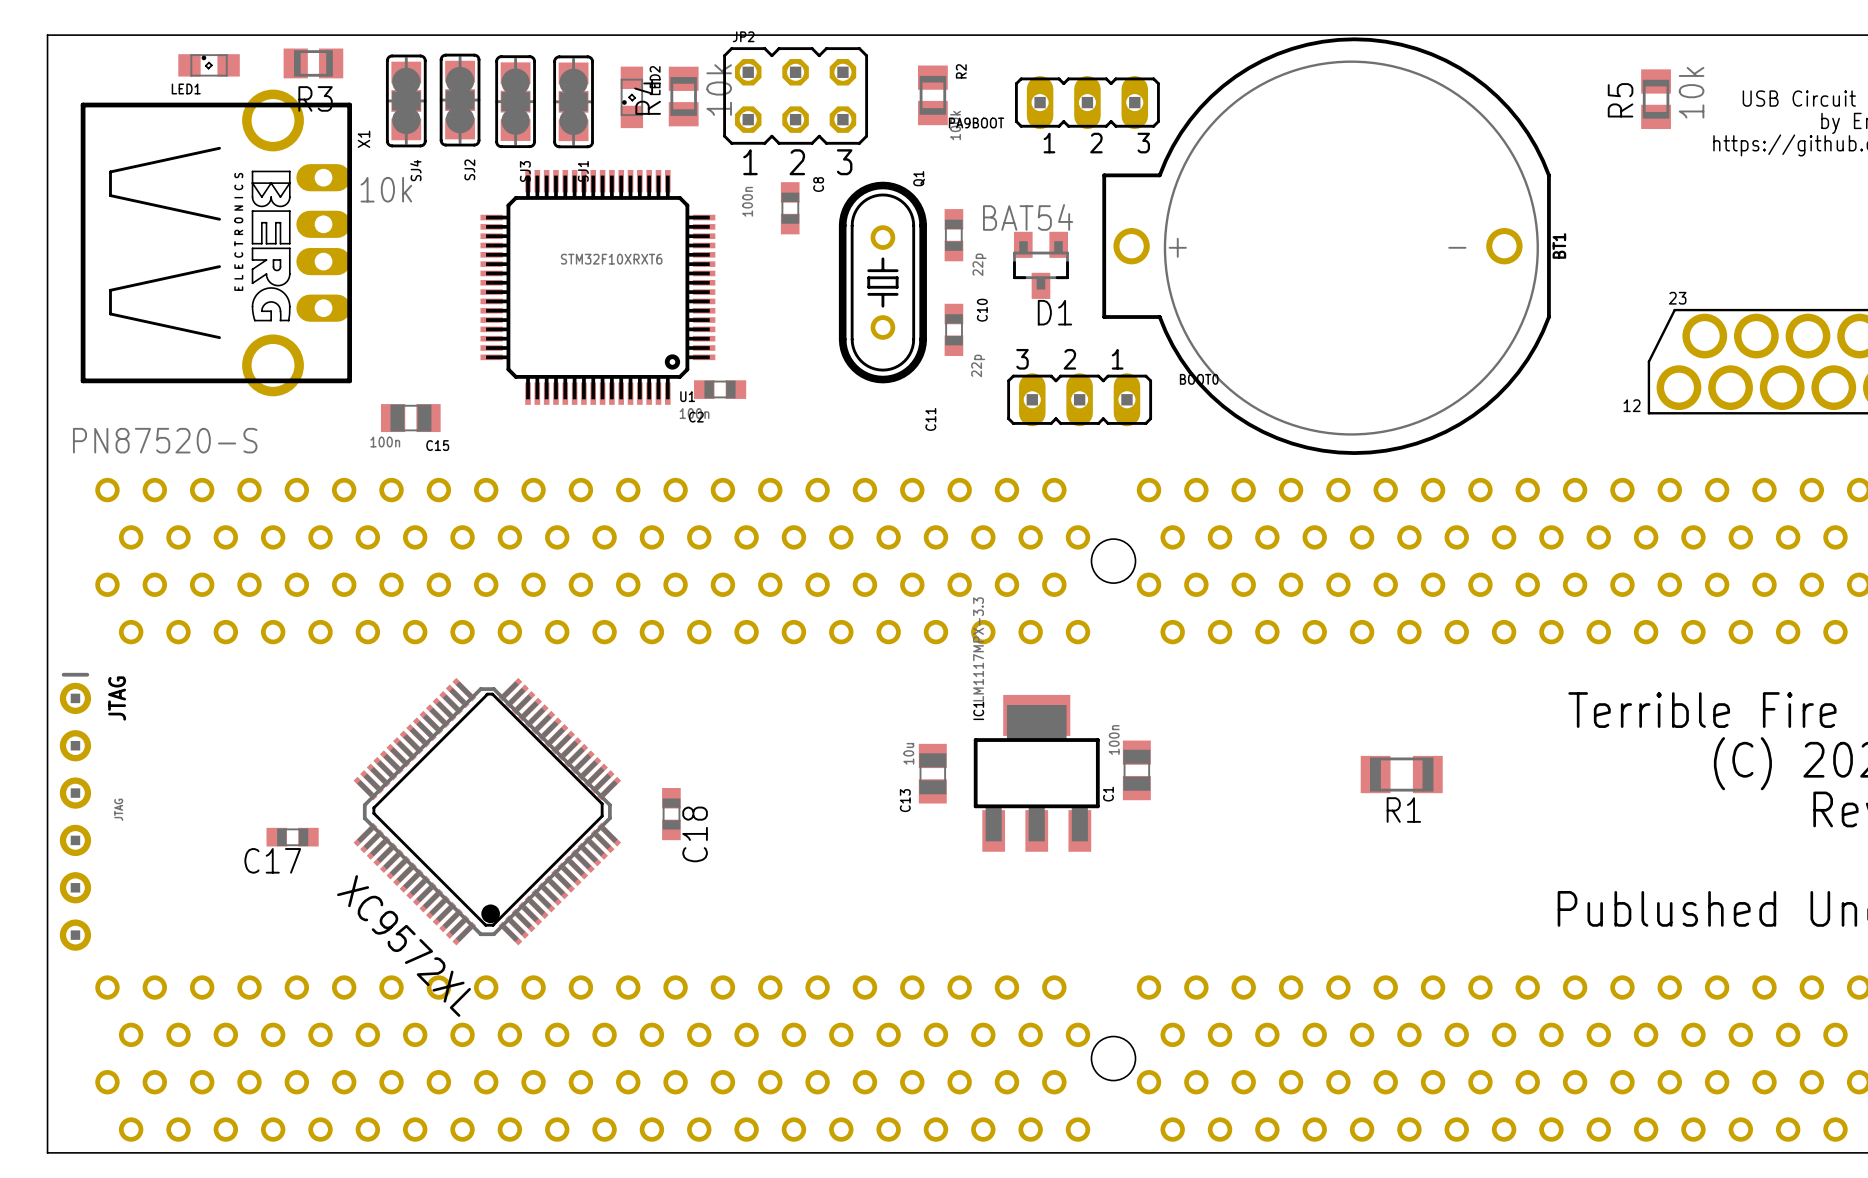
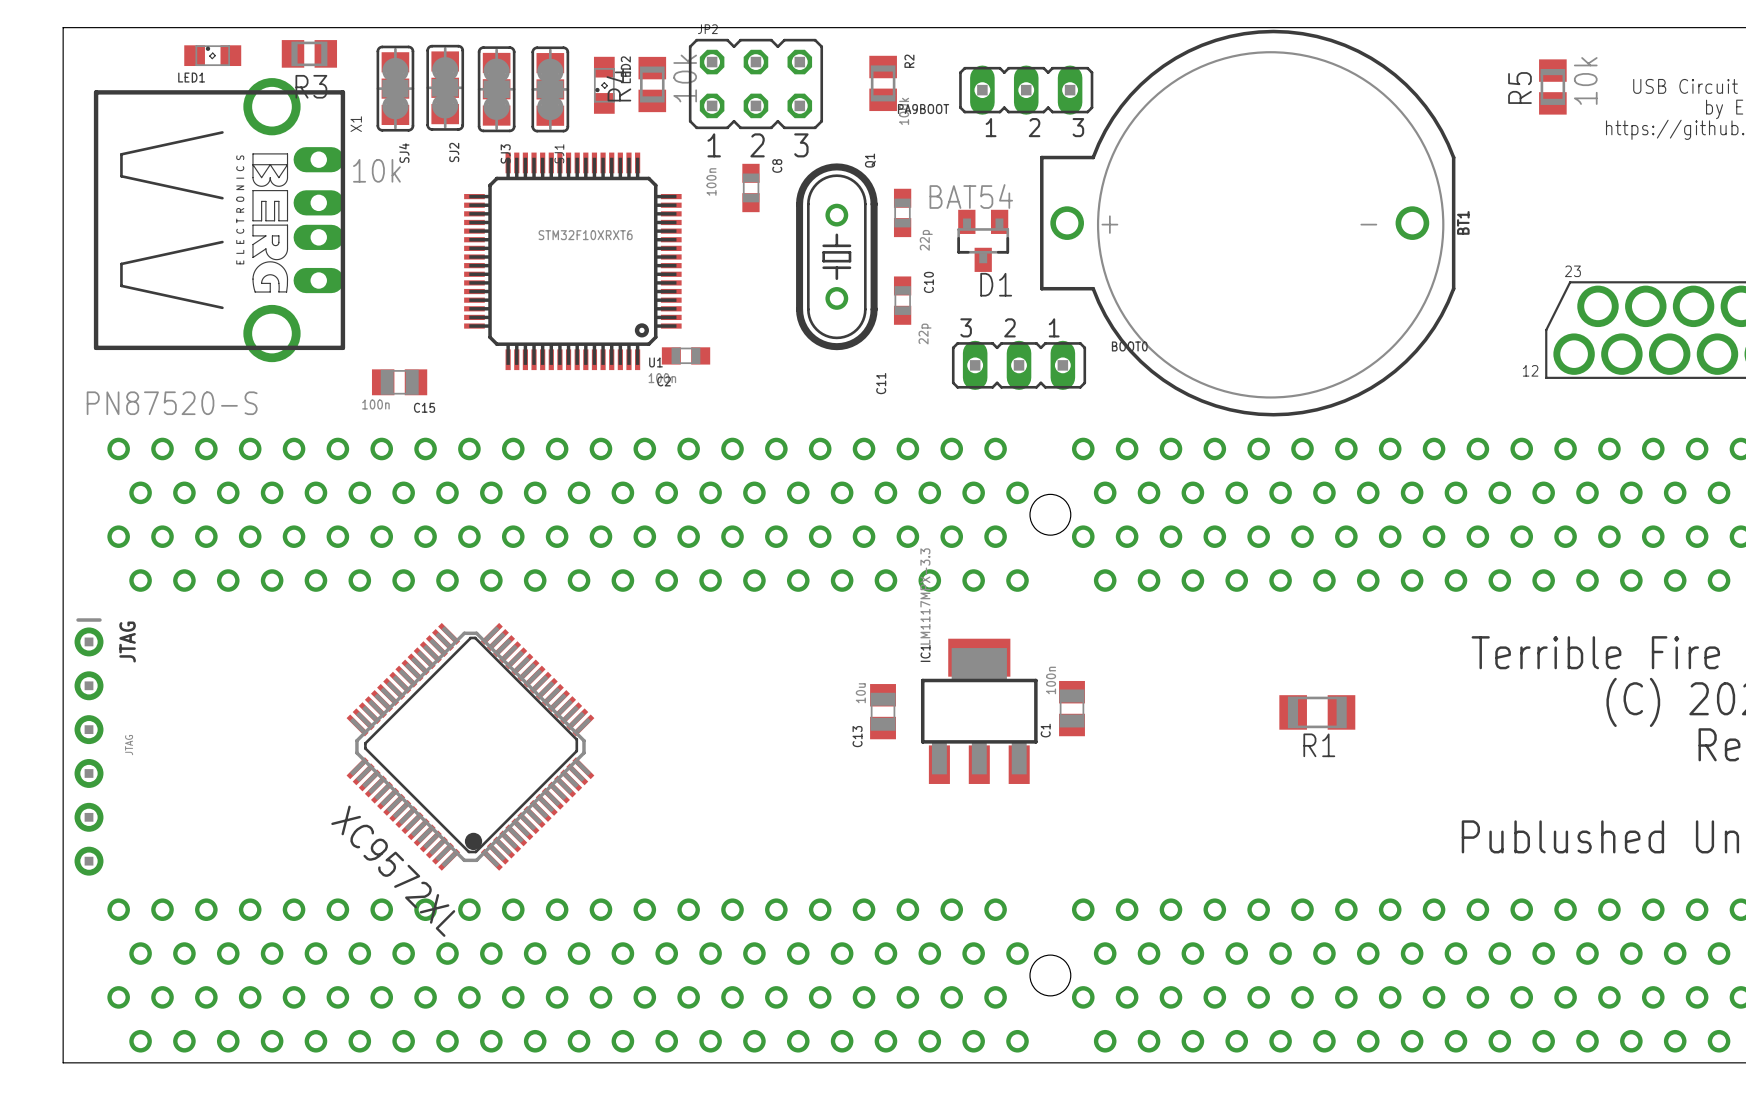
C18: (671, 814) -> none
C17: (292, 837) -> none

